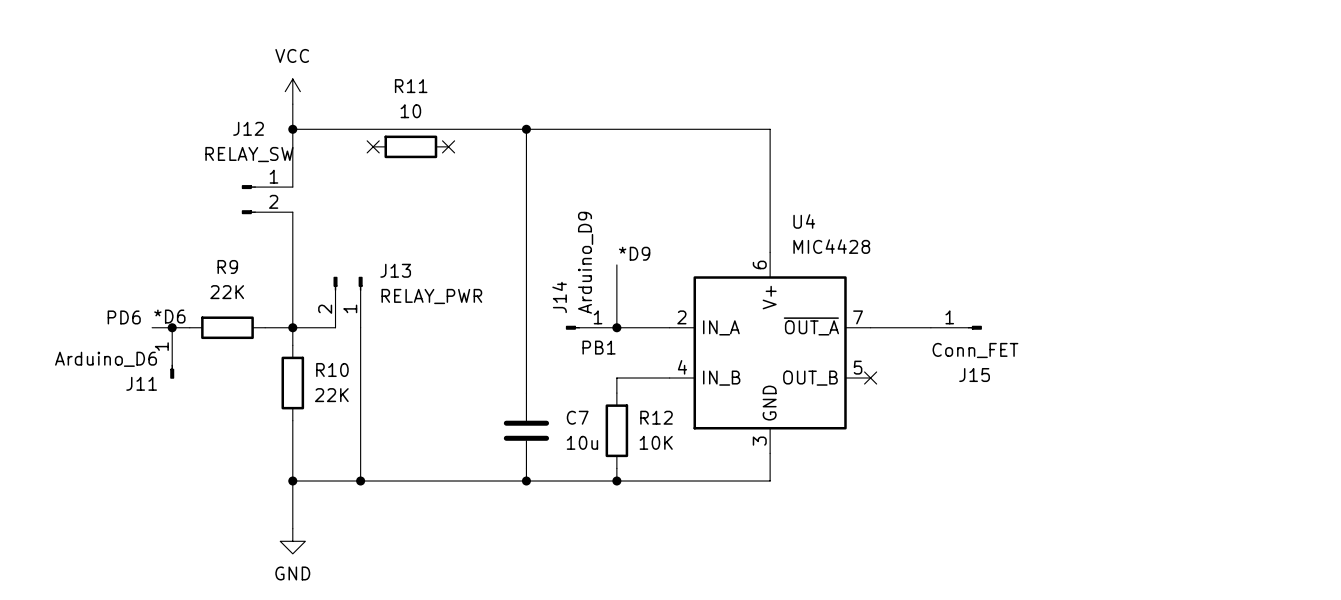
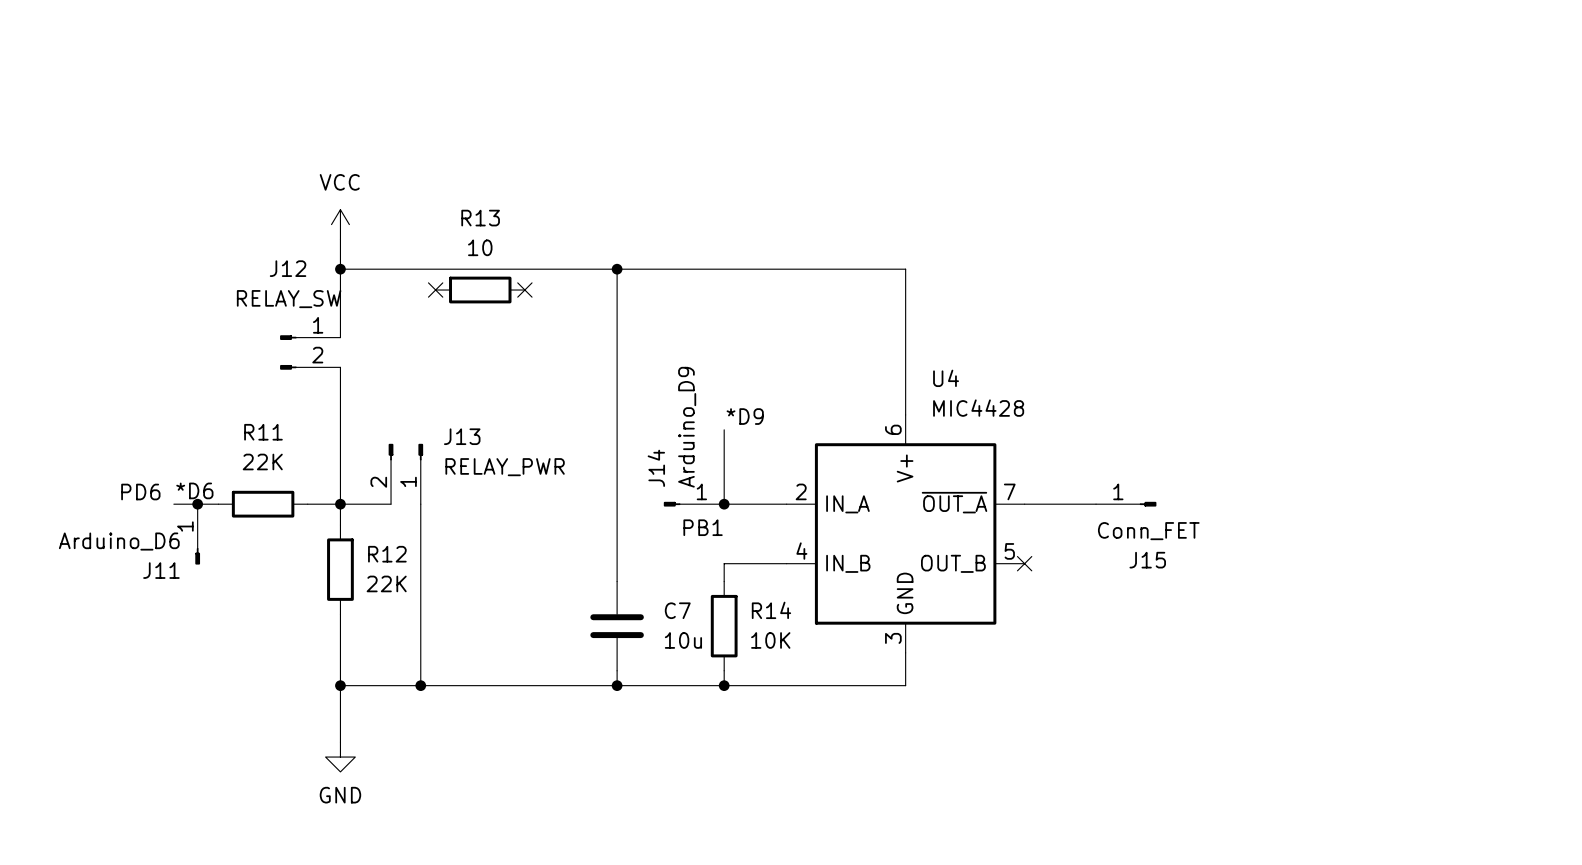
R11 name: R11 (411, 86) -> R13 (480, 218)
R9 name: R9 (227, 266) -> R11 (263, 432)
R10 name: R10 (332, 369) -> R12 (387, 554)
R12 name: R12 (656, 417) -> R14 (771, 610)

